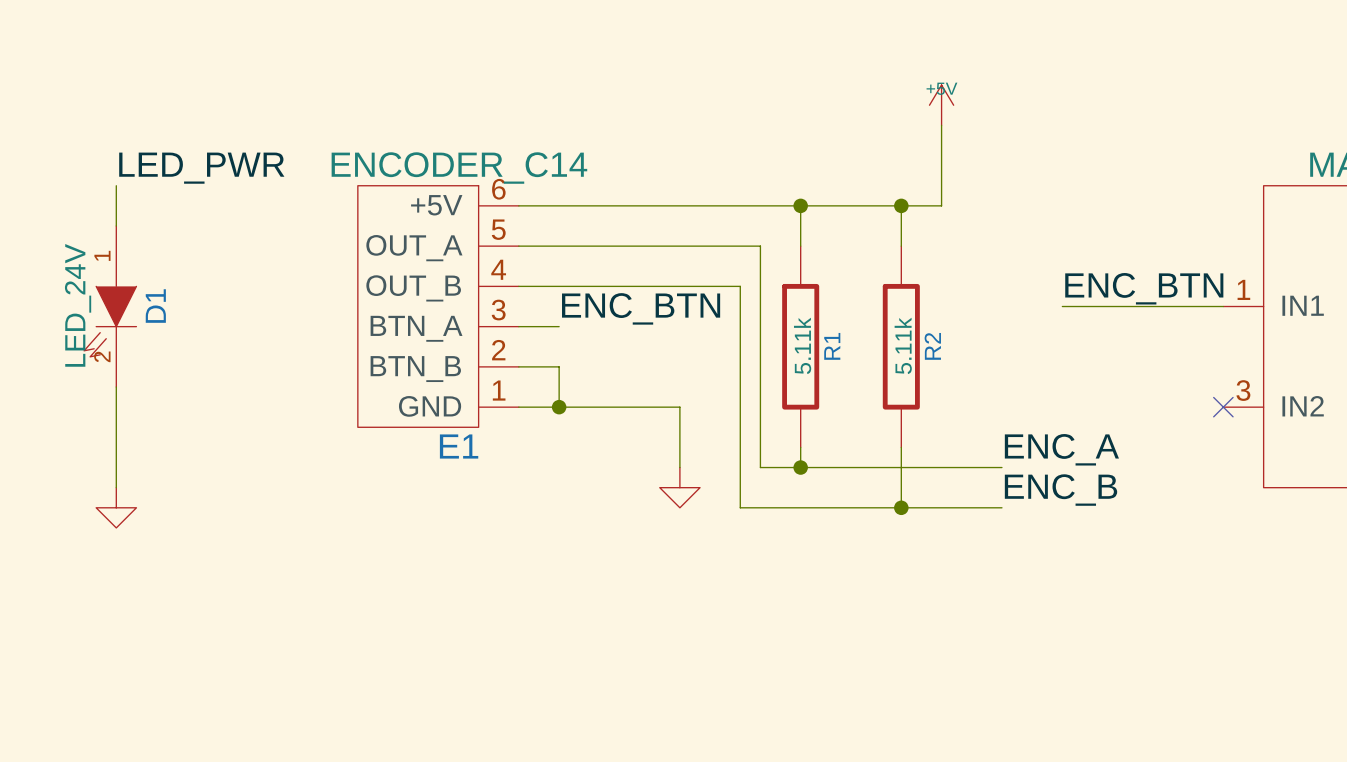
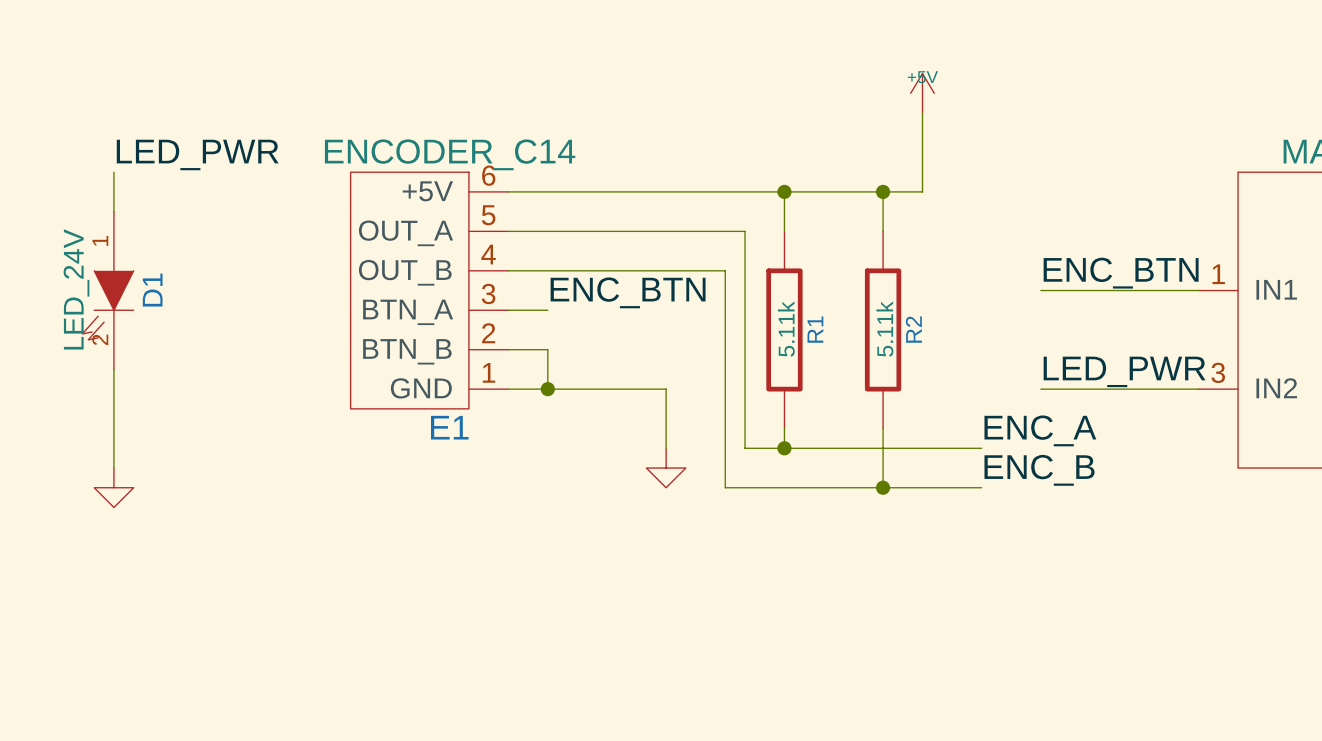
label: none -> LED_PWR (1124, 371)
wire: none -> (1040, 389) (1198, 389)
no-connect mark: (1223, 407) -> none

